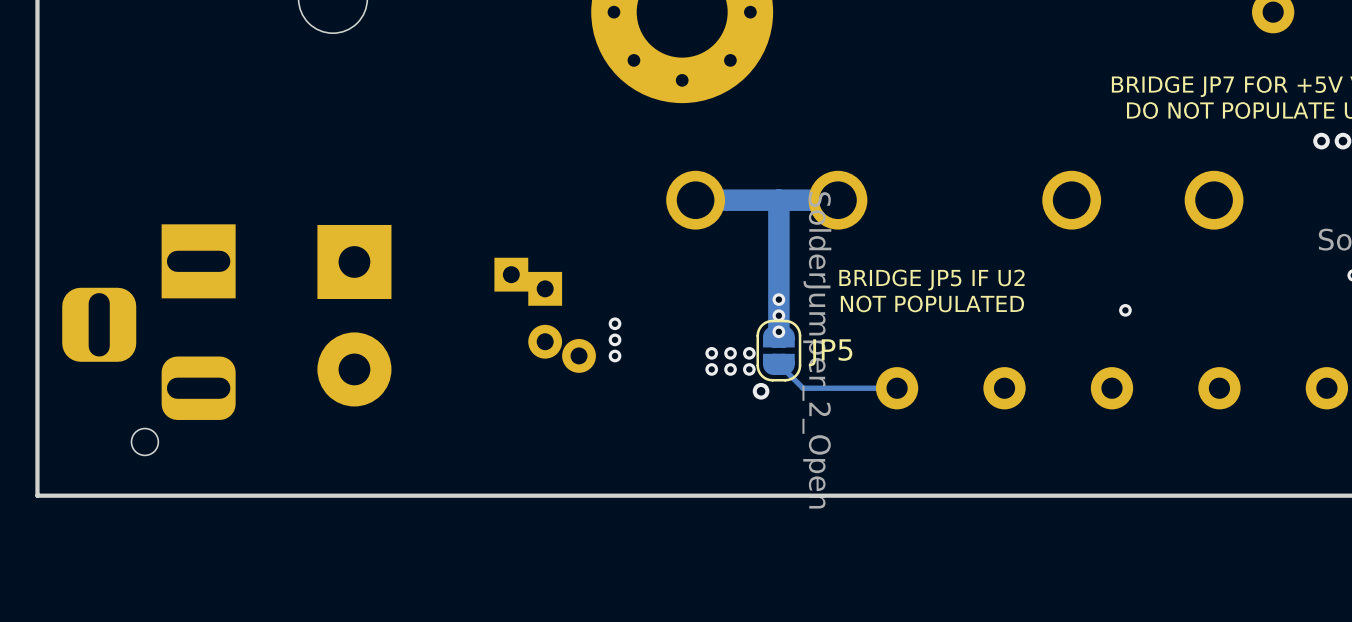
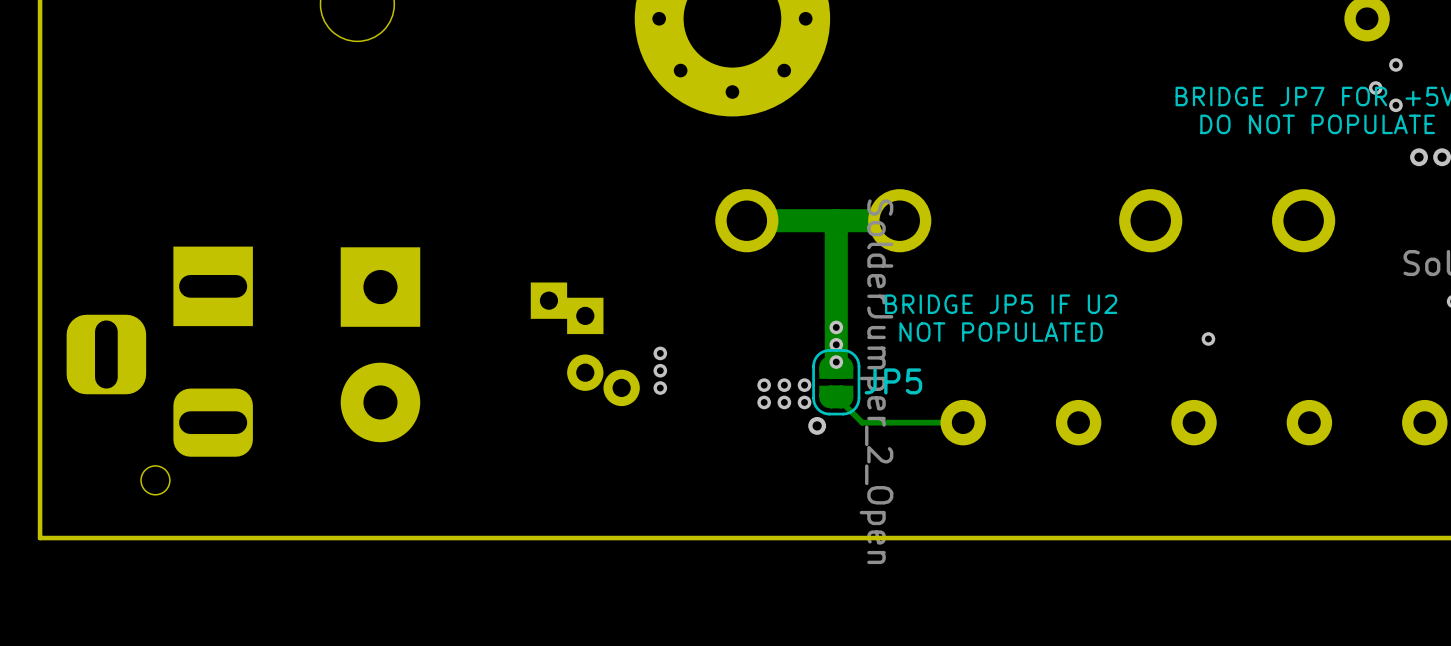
via: none -> (1395, 64)
via: none -> (1375, 88)
via: none -> (1395, 105)

